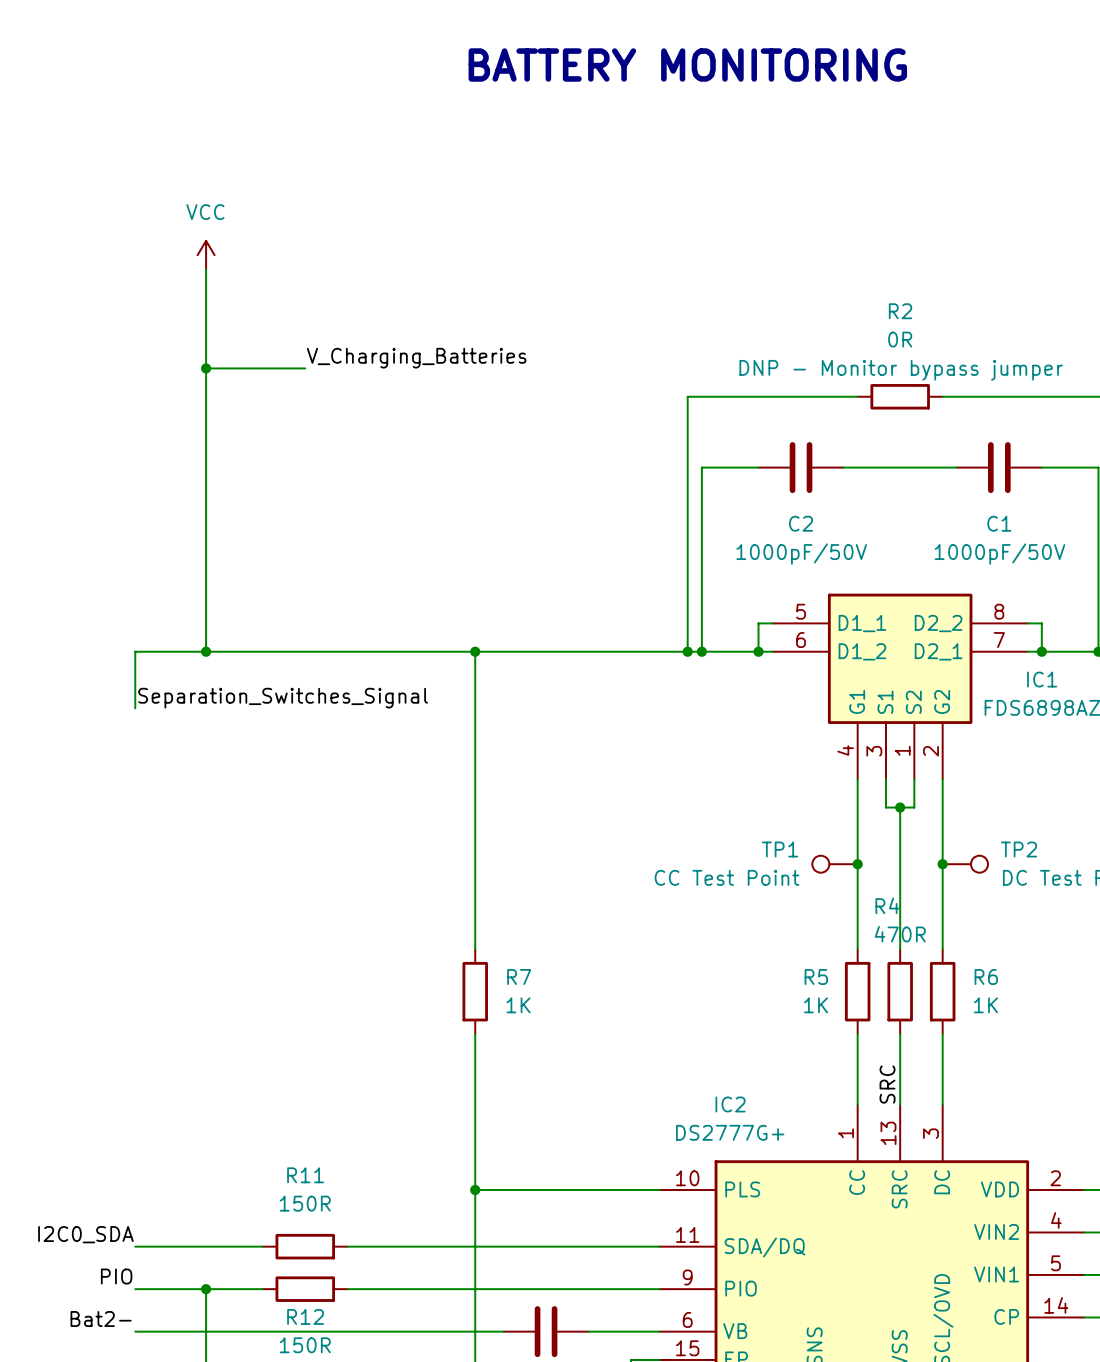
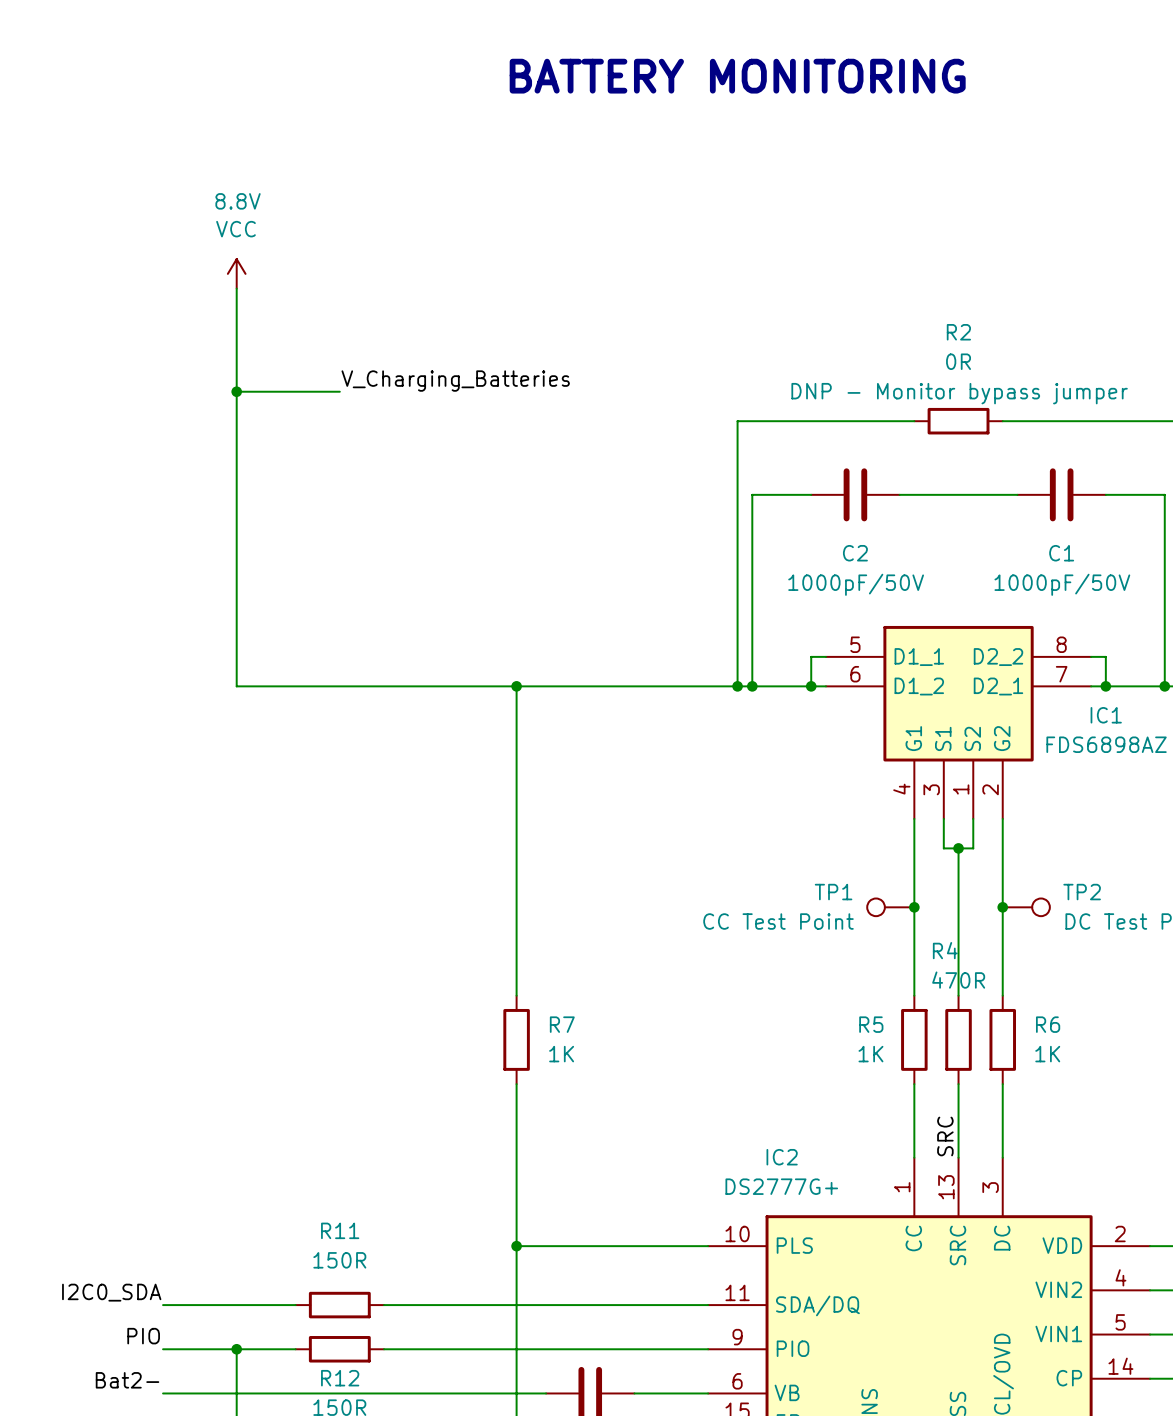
power symbol text: none -> 8.8V (238, 201)
wire: (206, 651) (135, 651) (135, 708) -> none
junction: (206, 651) -> none
label: Separation_Switches_Signal (283, 698) -> none

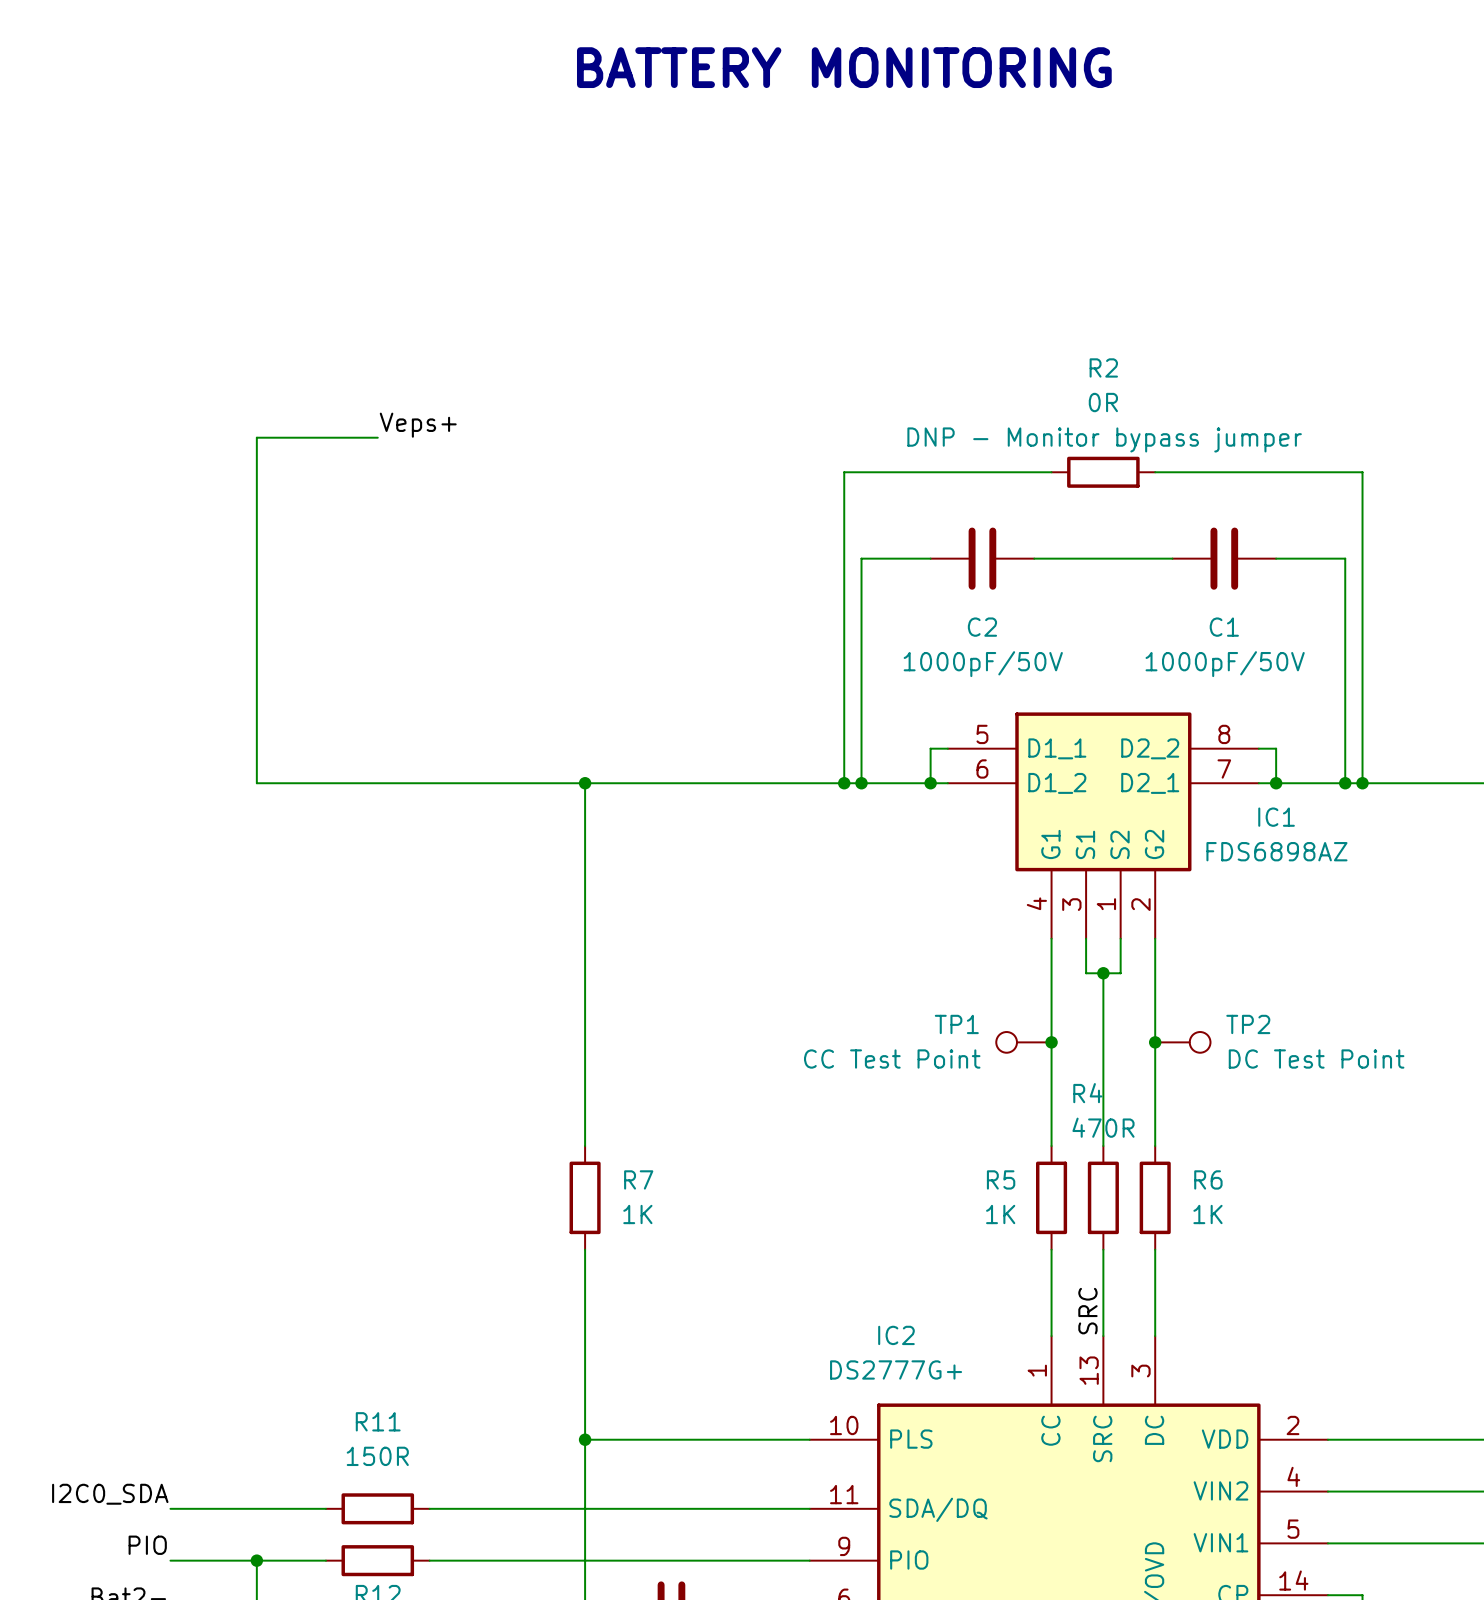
power symbol: VCC (236, 273) -> none
wire: (236, 288) (236, 391) -> none
label: V_Charging_Batteries (455, 381) -> Veps+ (418, 425)
junction: (236, 391) -> none

